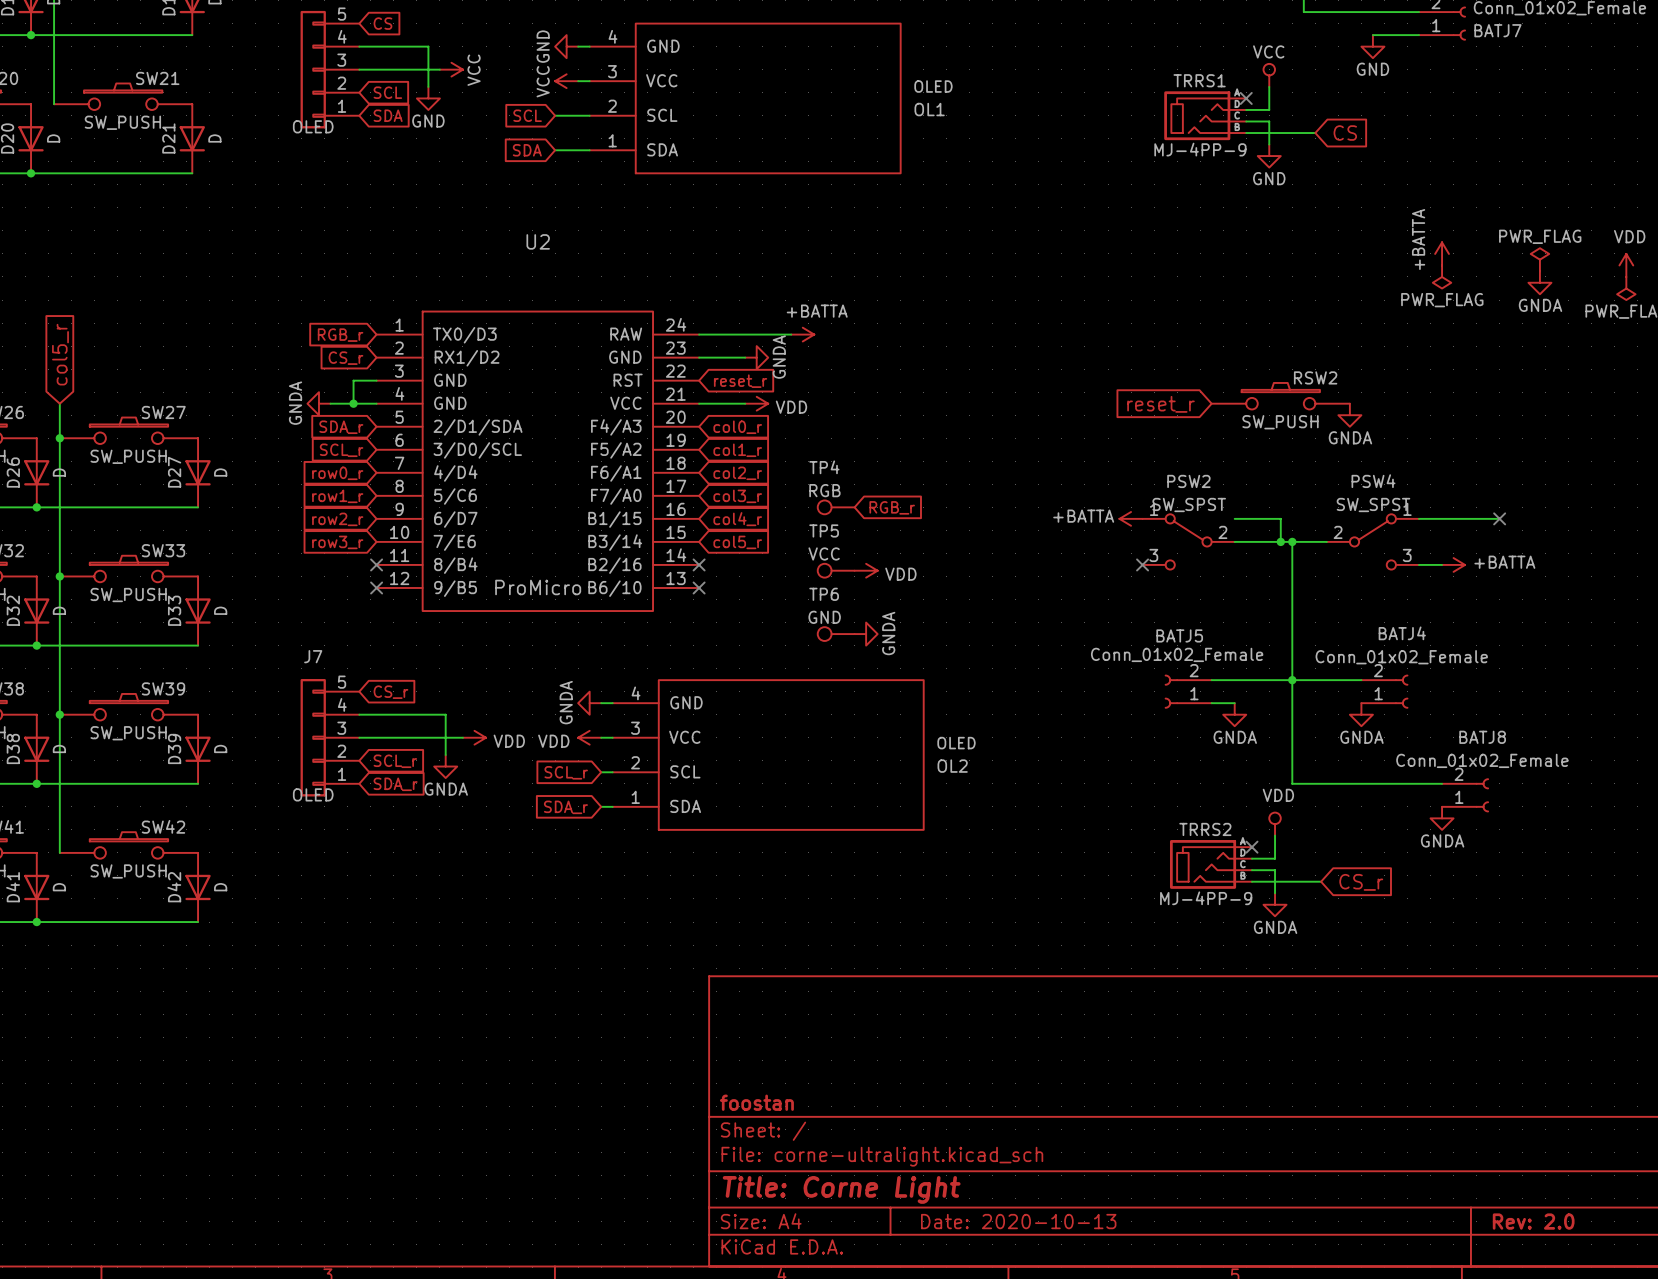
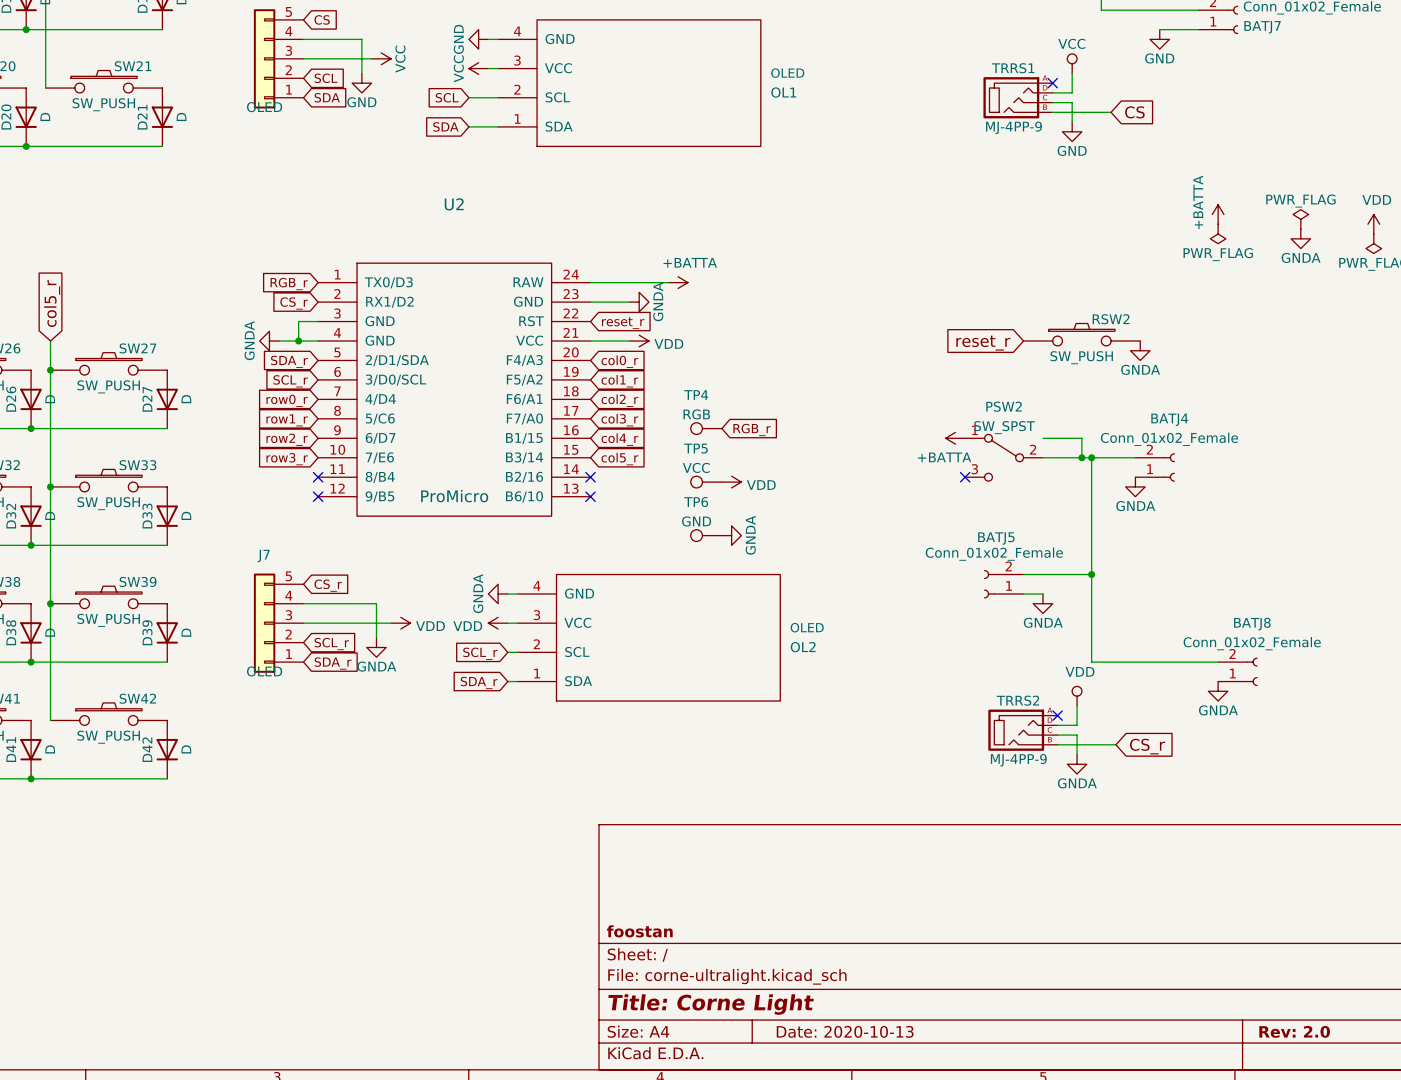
power symbol text position: +BATTA (1083, 516) -> +BATTA (944, 457)
wire: (1419, 518) (1499, 518) -> none
no-connect mark: (1499, 518) -> none
PSW4: SW_SPST (1372, 541) -> none
wire: (1419, 564) (1442, 564) -> none
power symbol: +BATTA (1453, 564) -> none
wire: (1292, 680) (1361, 680) -> none
BATJ4 position: (1384, 691) -> (1155, 467)
power symbol position: GNDA (1361, 714) -> GNDA (1135, 486)

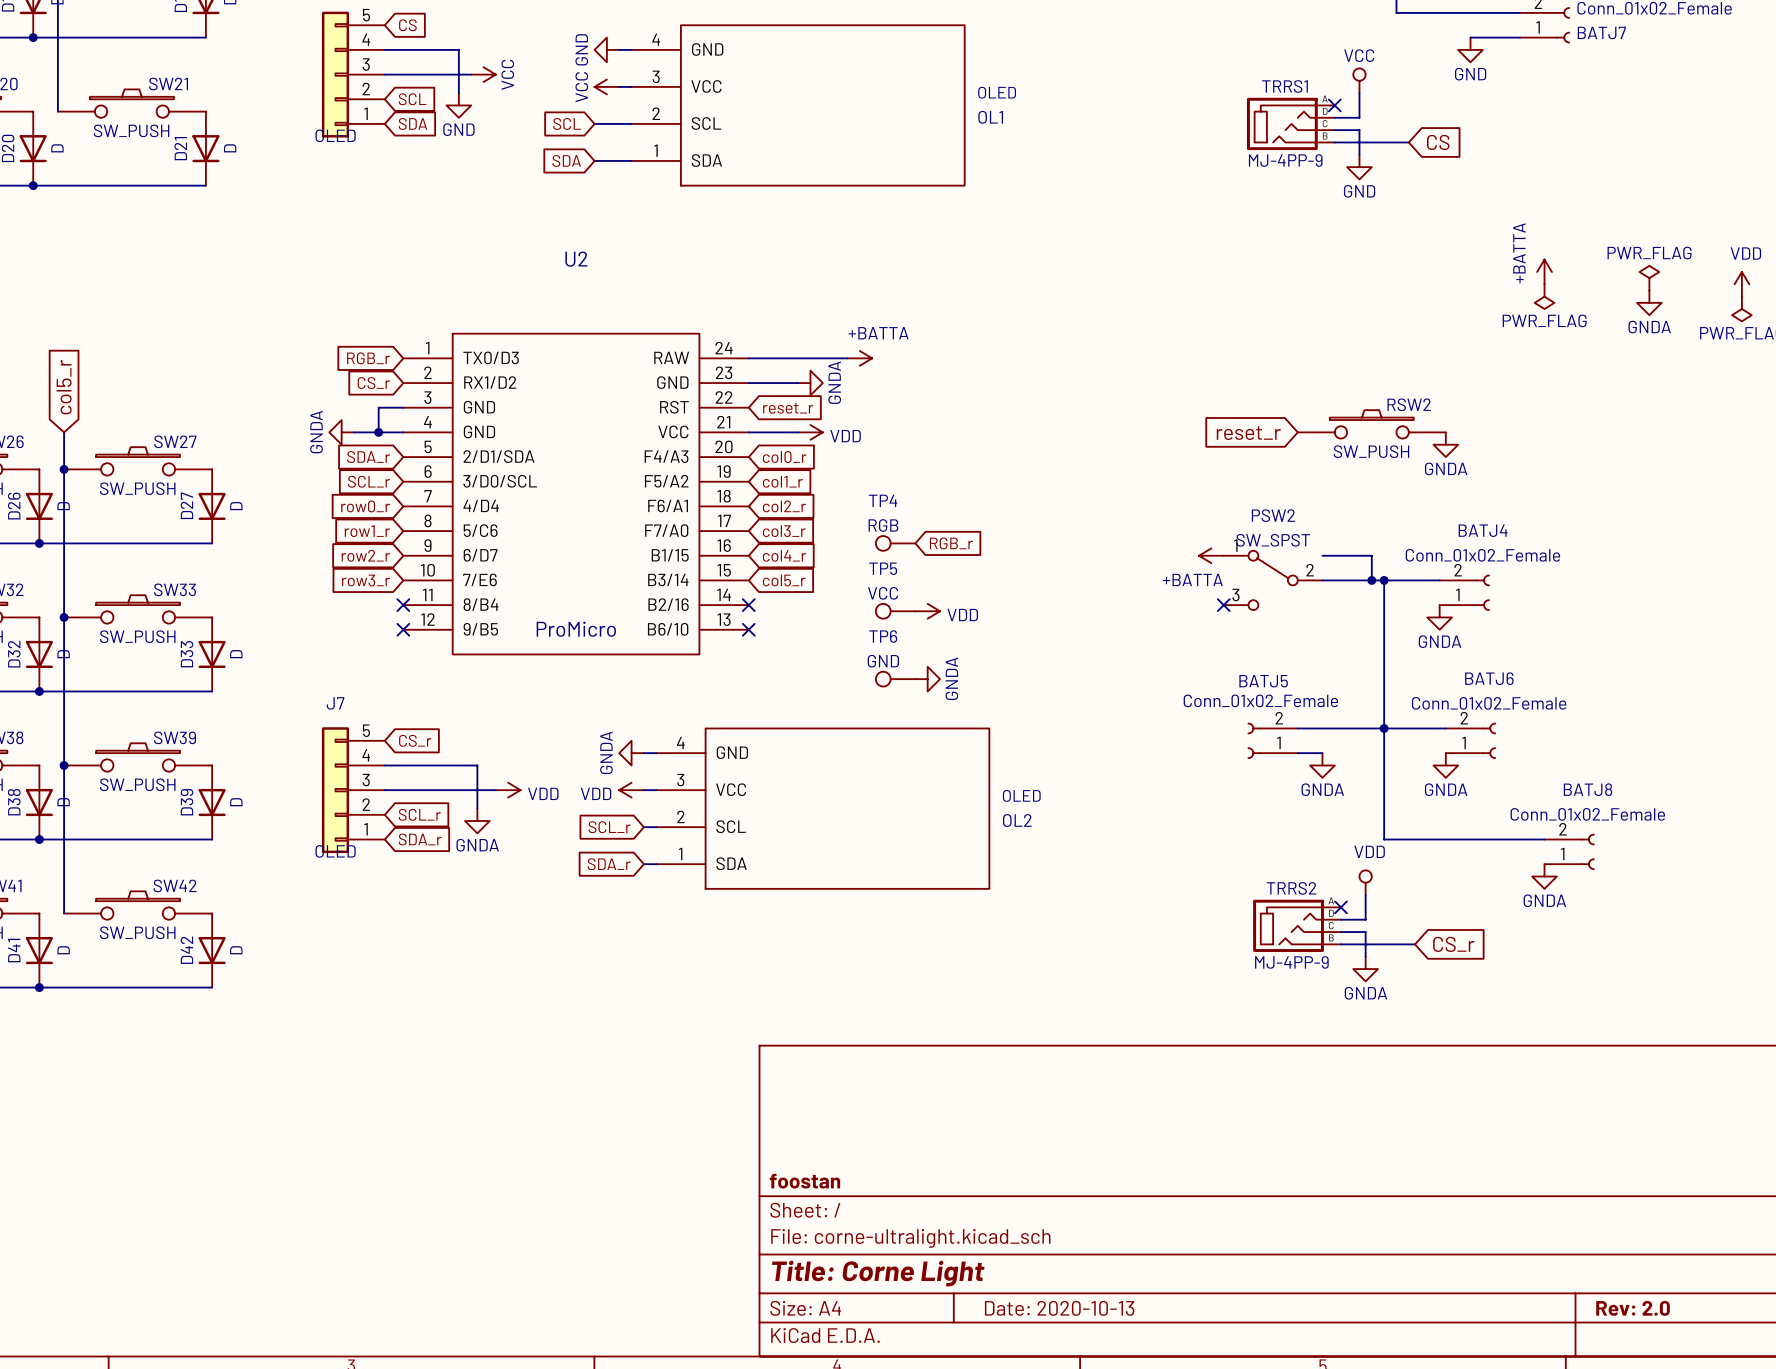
wire: none -> (1384, 728) (1445, 728)
BATJ6: none -> Conn_01x02_Female (1470, 740)
power symbol: none -> GNDA (1445, 765)

